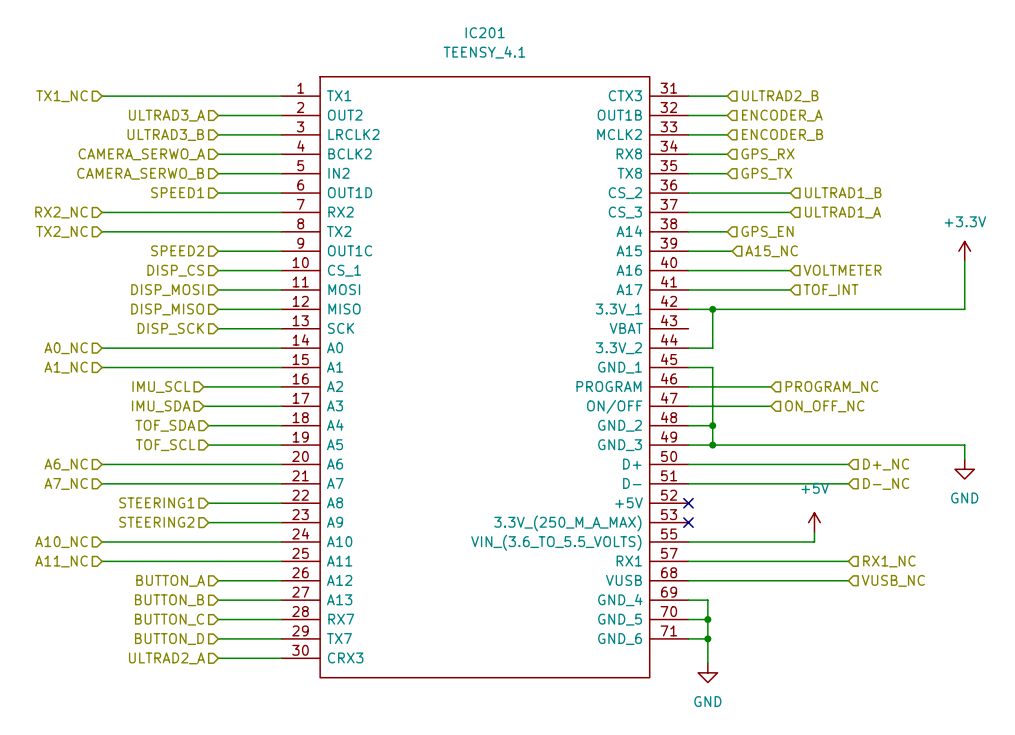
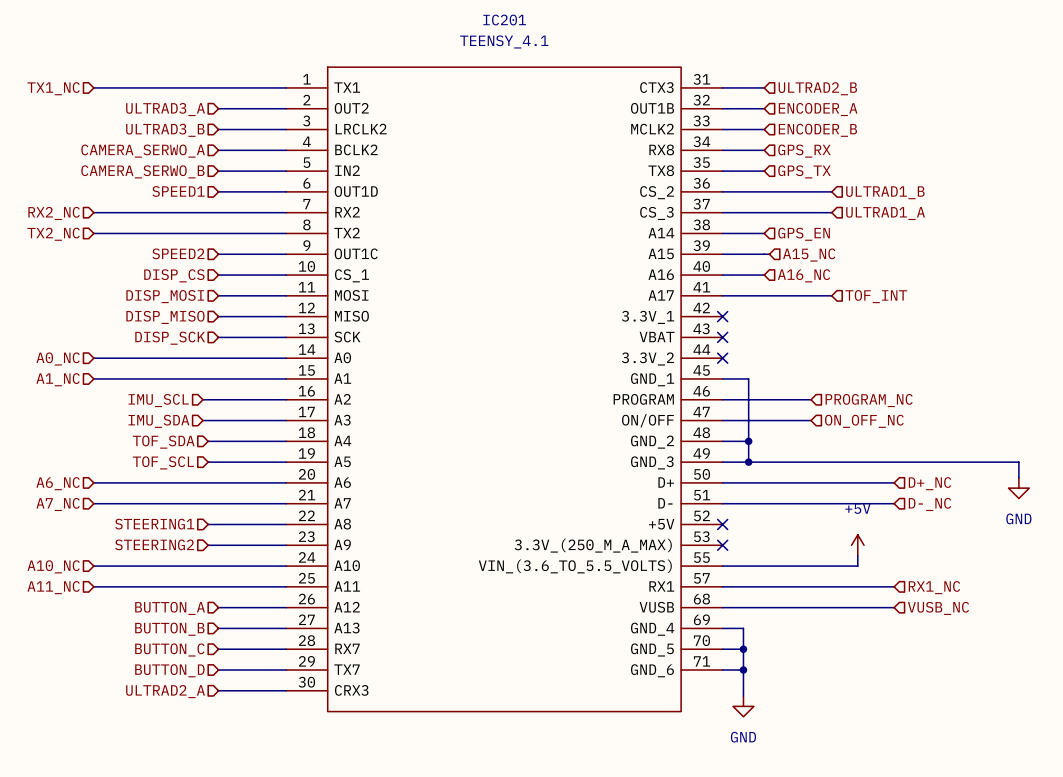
power symbol: +3.3V (964, 251) -> none
wire: (964, 260) (964, 309) (688, 309) -> none
wire: (727, 270) (790, 270) -> none
hierarchical label: none -> A16_NC (804, 275)
hierarchical label: VOLTMETER (842, 270) -> none
no-connect mark: none -> (722, 316)
wire: (712, 309) (712, 348) (688, 348) -> none
junction: (712, 309) -> none
no-connect mark: none -> (722, 337)
no-connect mark: none -> (722, 358)

